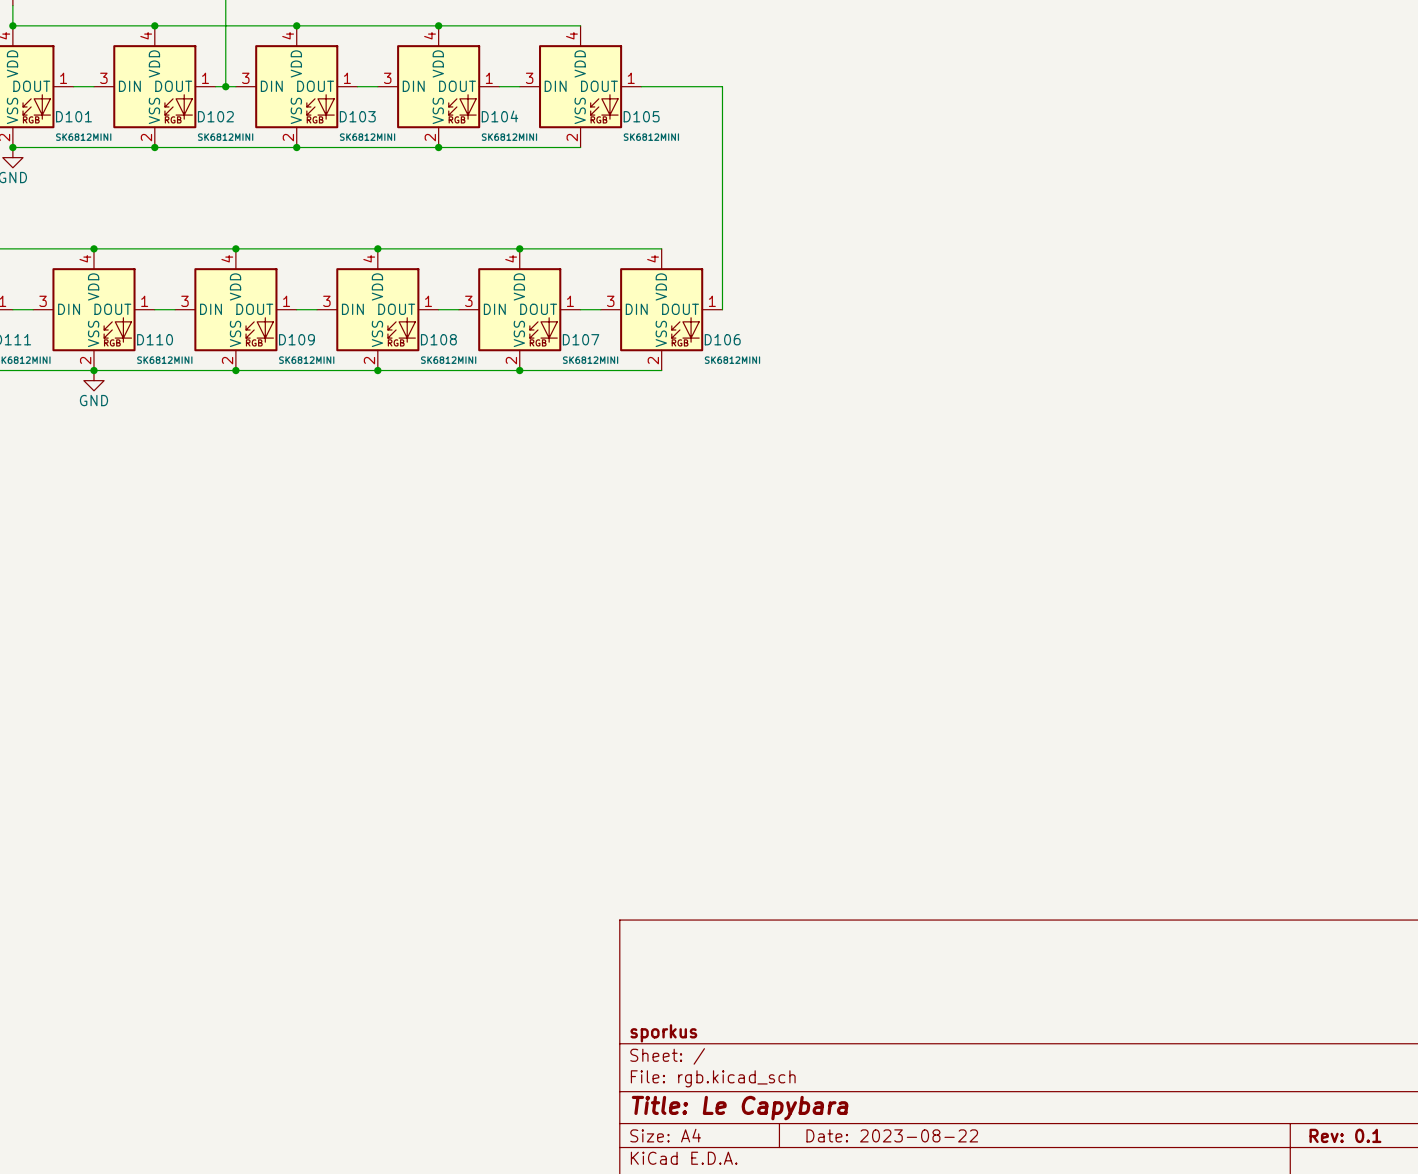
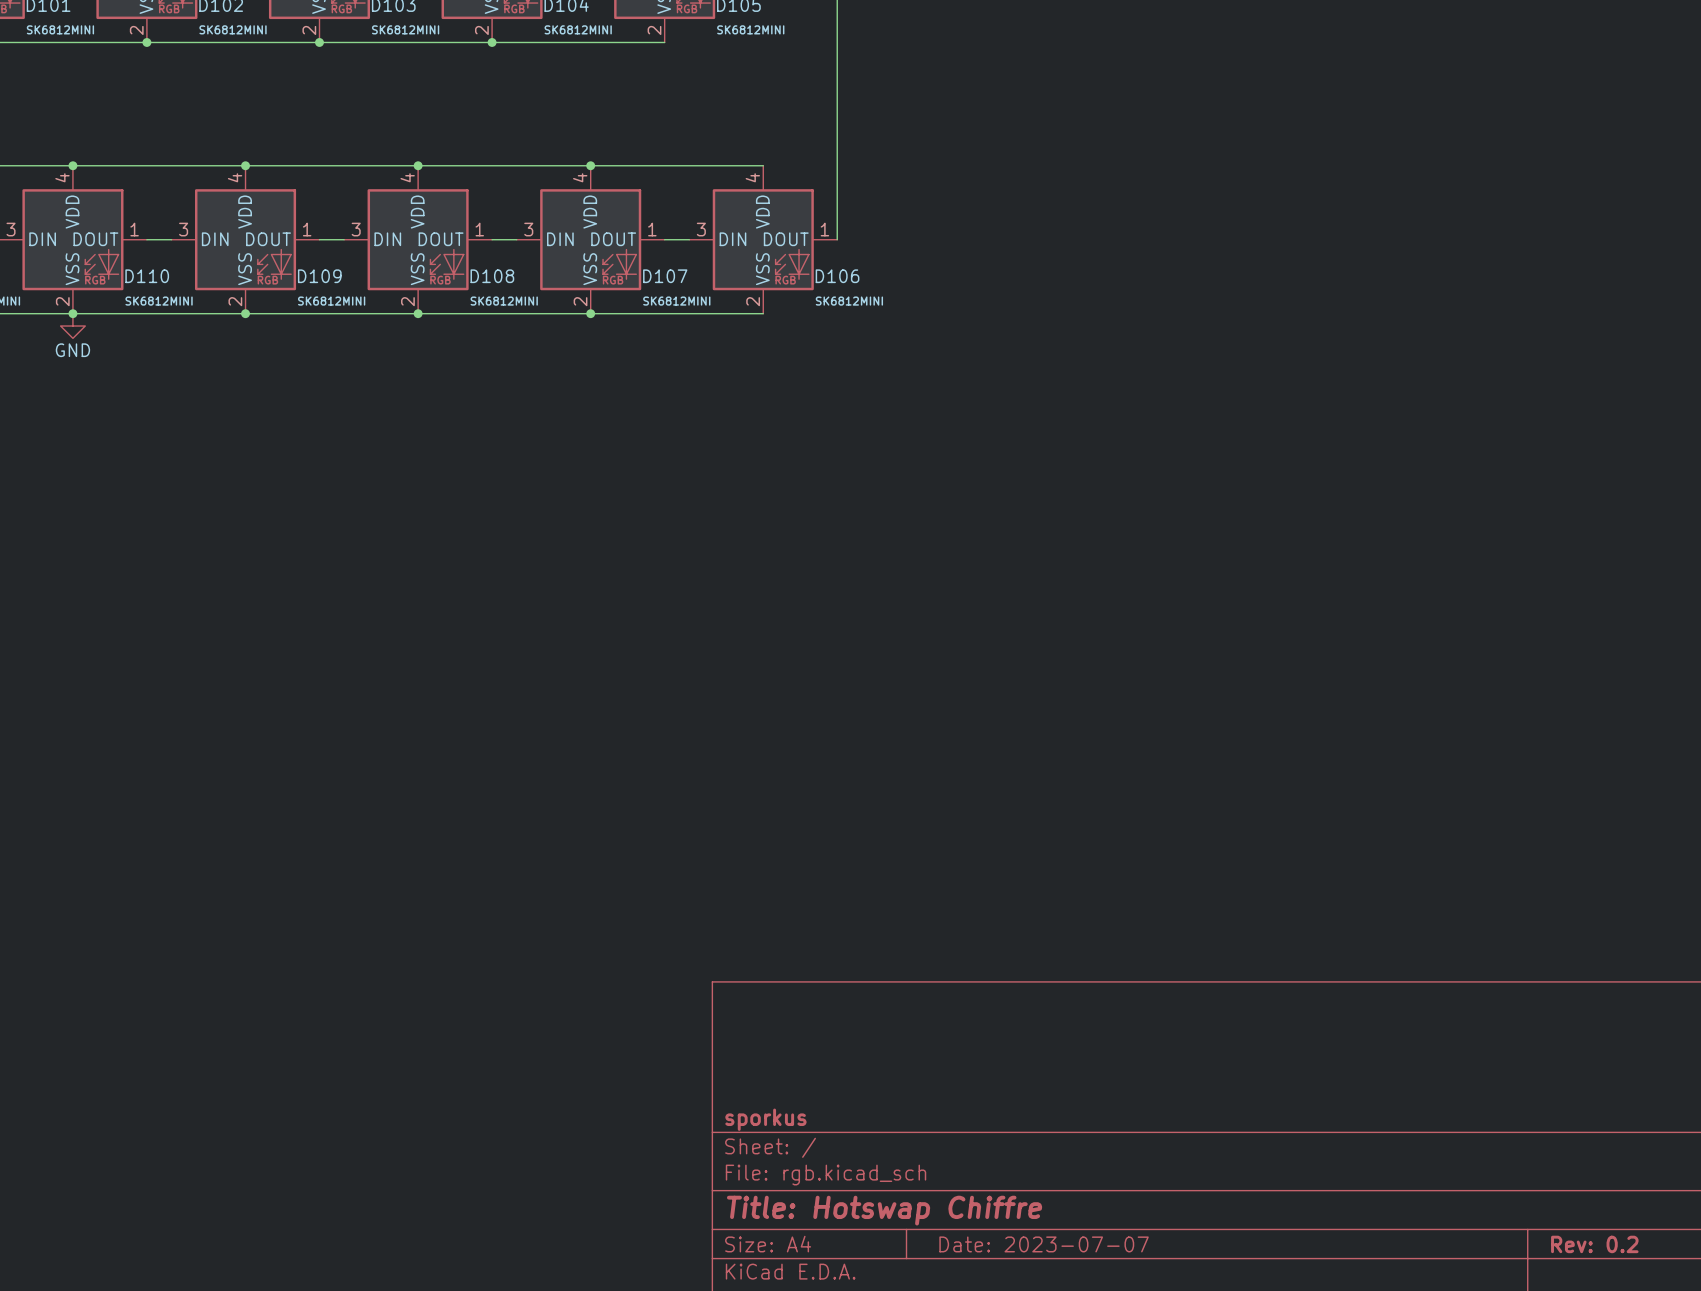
title block: Title: Le Capybara (740, 1108) -> Title: Hotswap Chiffre (884, 1210)
title block: Date: 2023-08-22 (892, 1135) -> Date: 2023-07-07 (1044, 1244)
title block: Rev: 0.1 (1345, 1135) -> Rev: 0.2 (1594, 1244)

